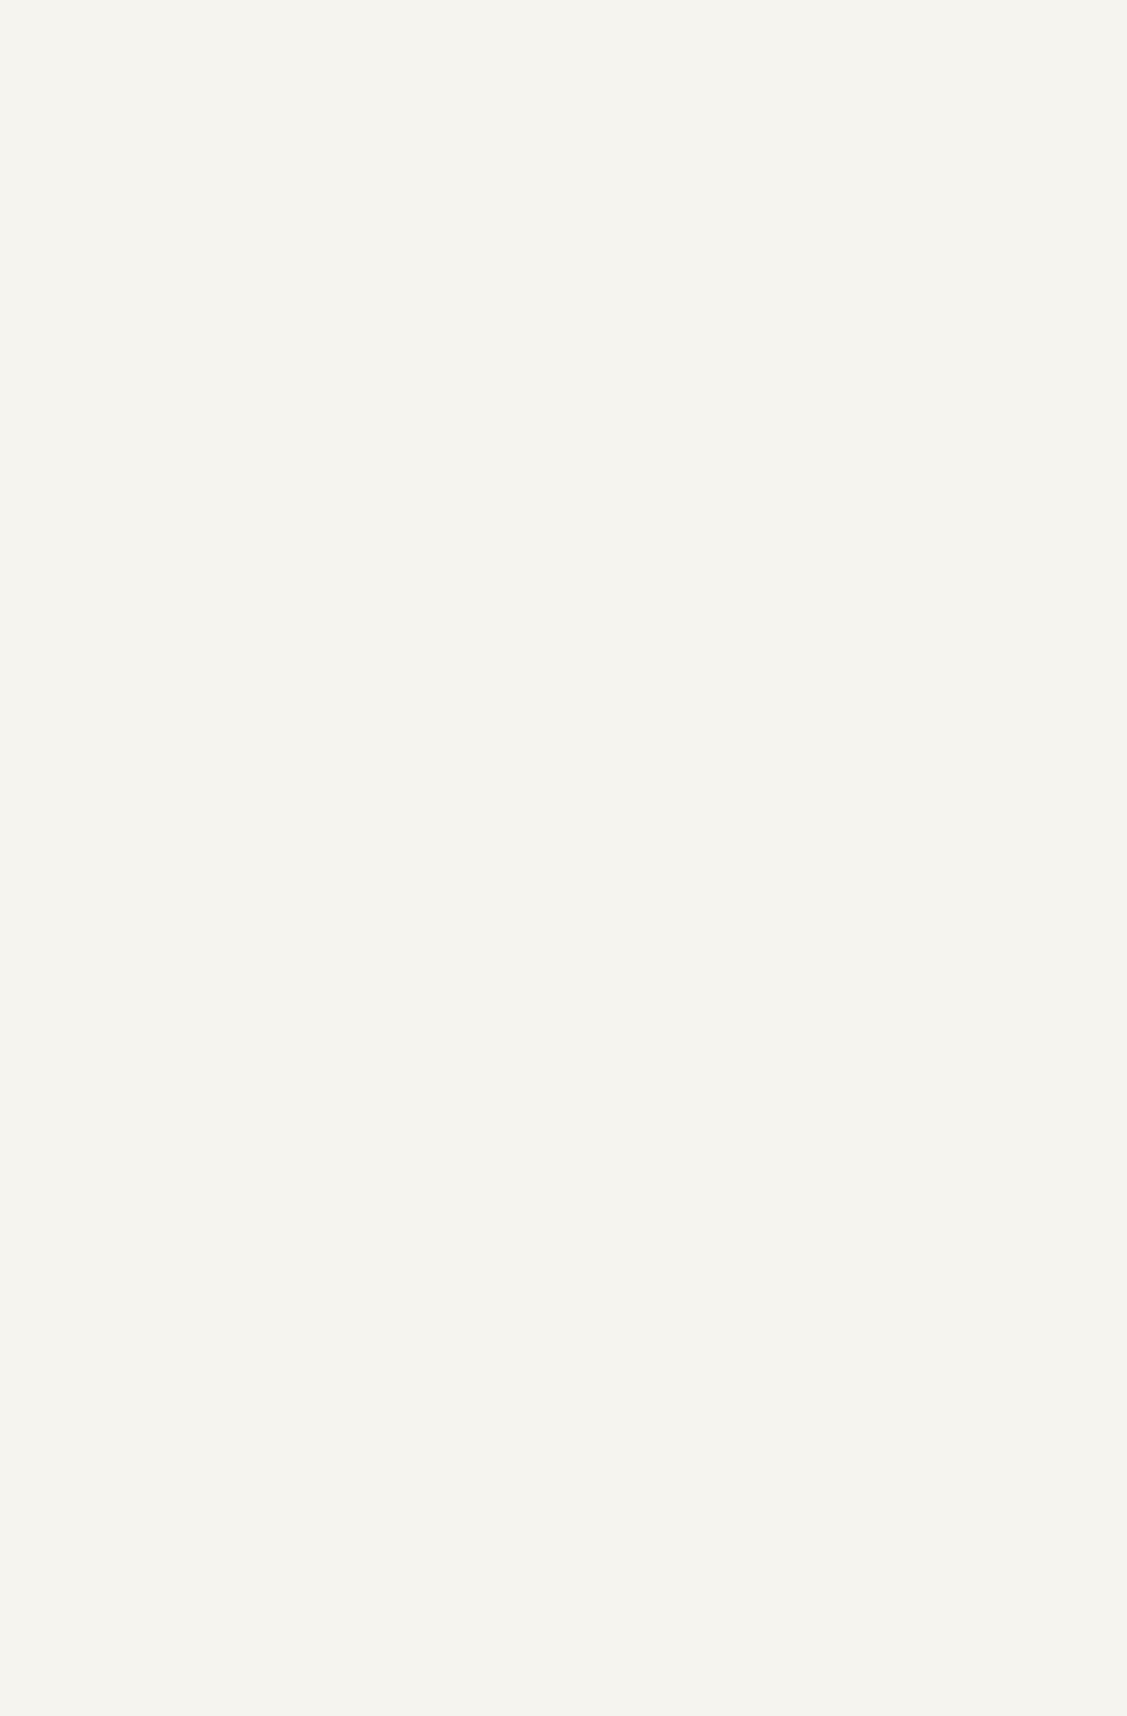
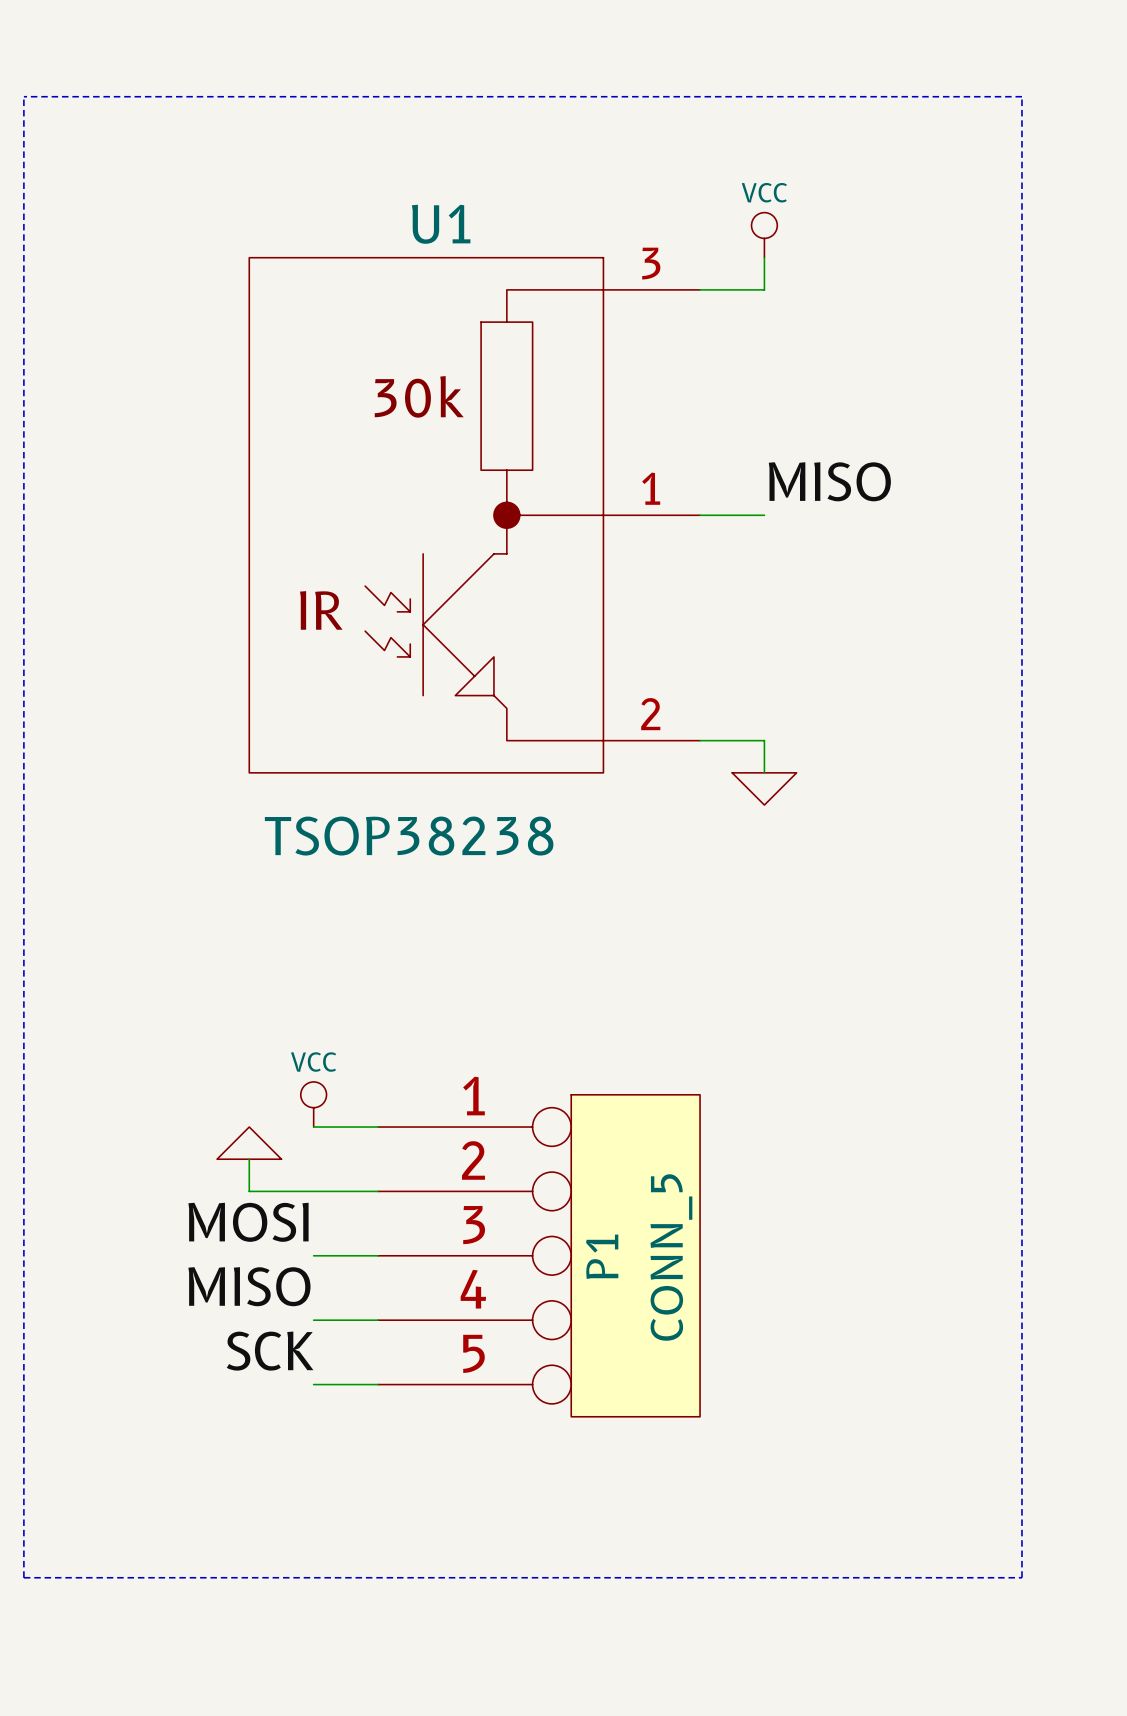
line: none -> (23, 96) (23, 1577) (1021, 1577) (1021, 96) (23, 96)
power symbol: none -> VCC (764, 235)
wire: none -> (764, 257) (764, 289) (700, 289)
label: none -> MISO (829, 481)
U1: none -> TSOP38238 (474, 515)
wire: none -> (700, 515) (764, 515)
wire: none -> (700, 740) (764, 740) (764, 772)
power symbol: none -> (764, 788)
power symbol: none -> VCC (313, 1104)
wire: none -> (313, 1127) (378, 1127)
power symbol: none -> (249, 1143)
wire: none -> (249, 1159) (249, 1191) (378, 1191)
label: none -> MOSI (248, 1222)
wire: none -> (313, 1255) (378, 1255)
P1: none -> CONN_5 (539, 1255)
label: none -> MISO (249, 1286)
wire: none -> (313, 1320) (378, 1320)
label: none -> SCK (270, 1351)
wire: none -> (313, 1384) (378, 1384)

